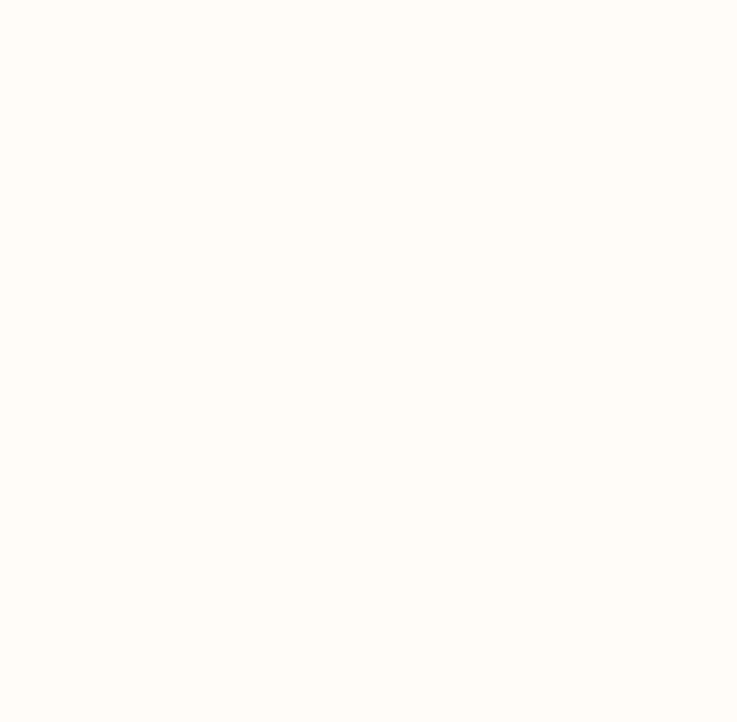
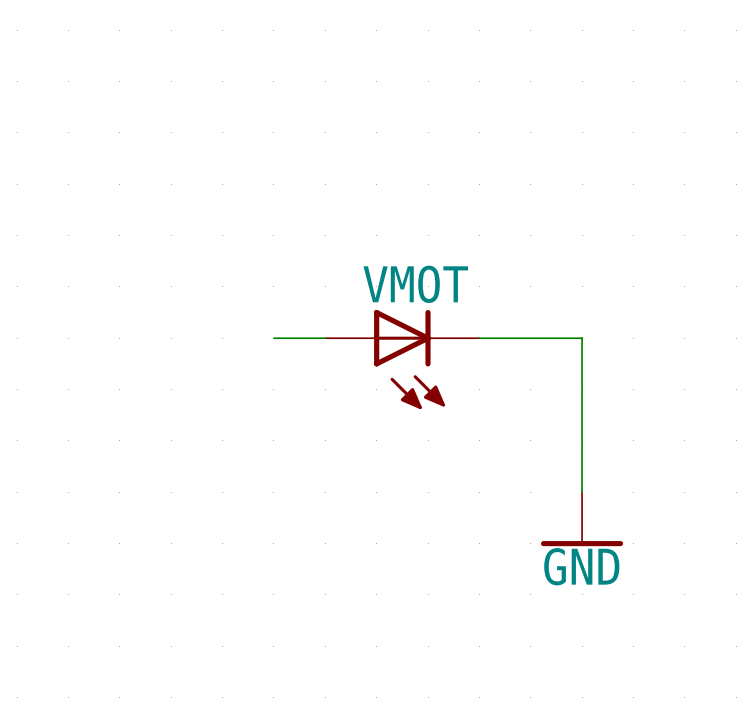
wire: none -> (273, 338) (325, 338)
wire: none -> (479, 338) (582, 338) (582, 492)
VMOT: none -> (402, 359)
power symbol: none -> GND (582, 519)

